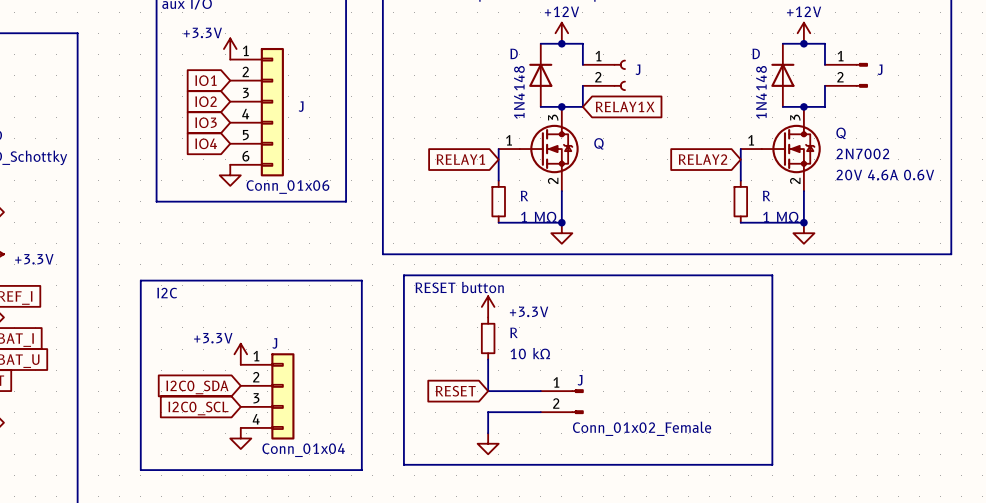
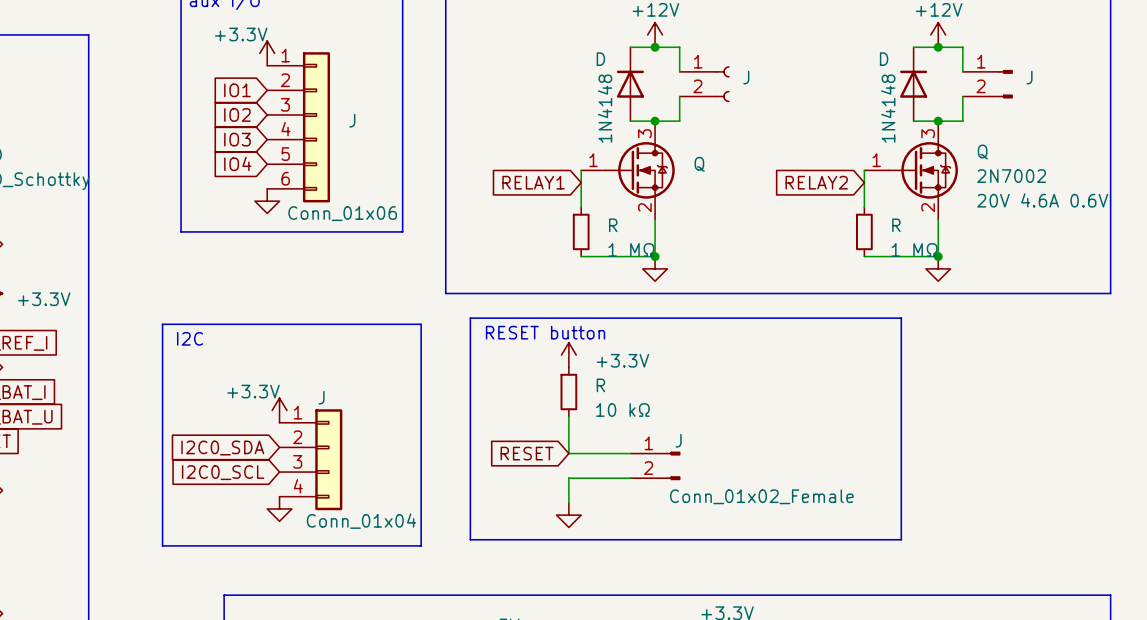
global label: RELAY1X (625, 106) -> none

